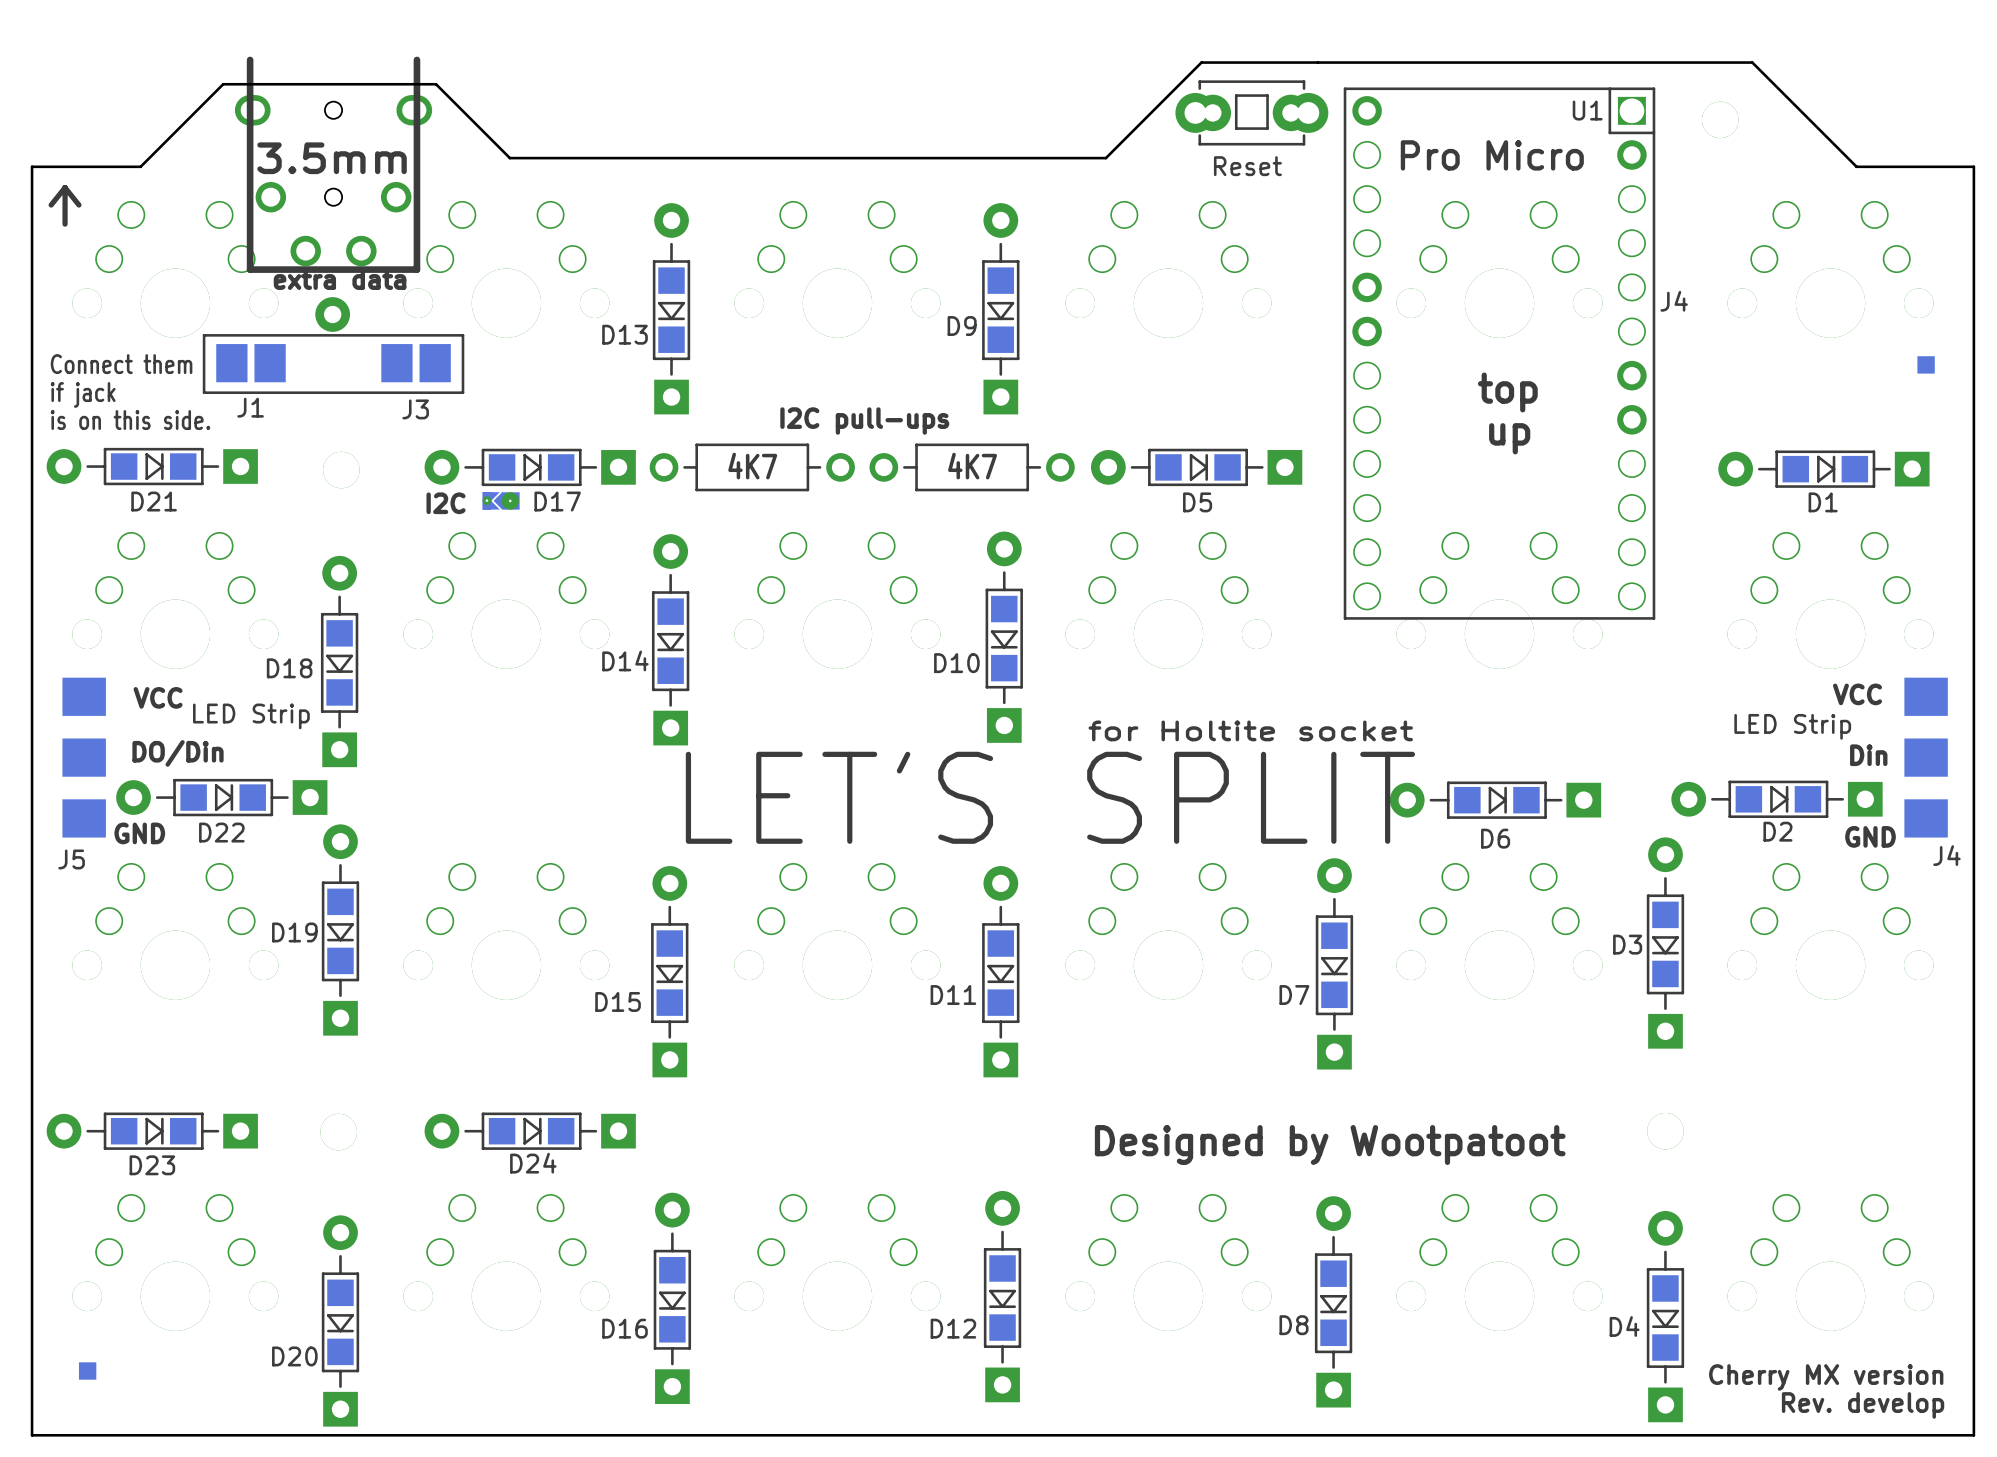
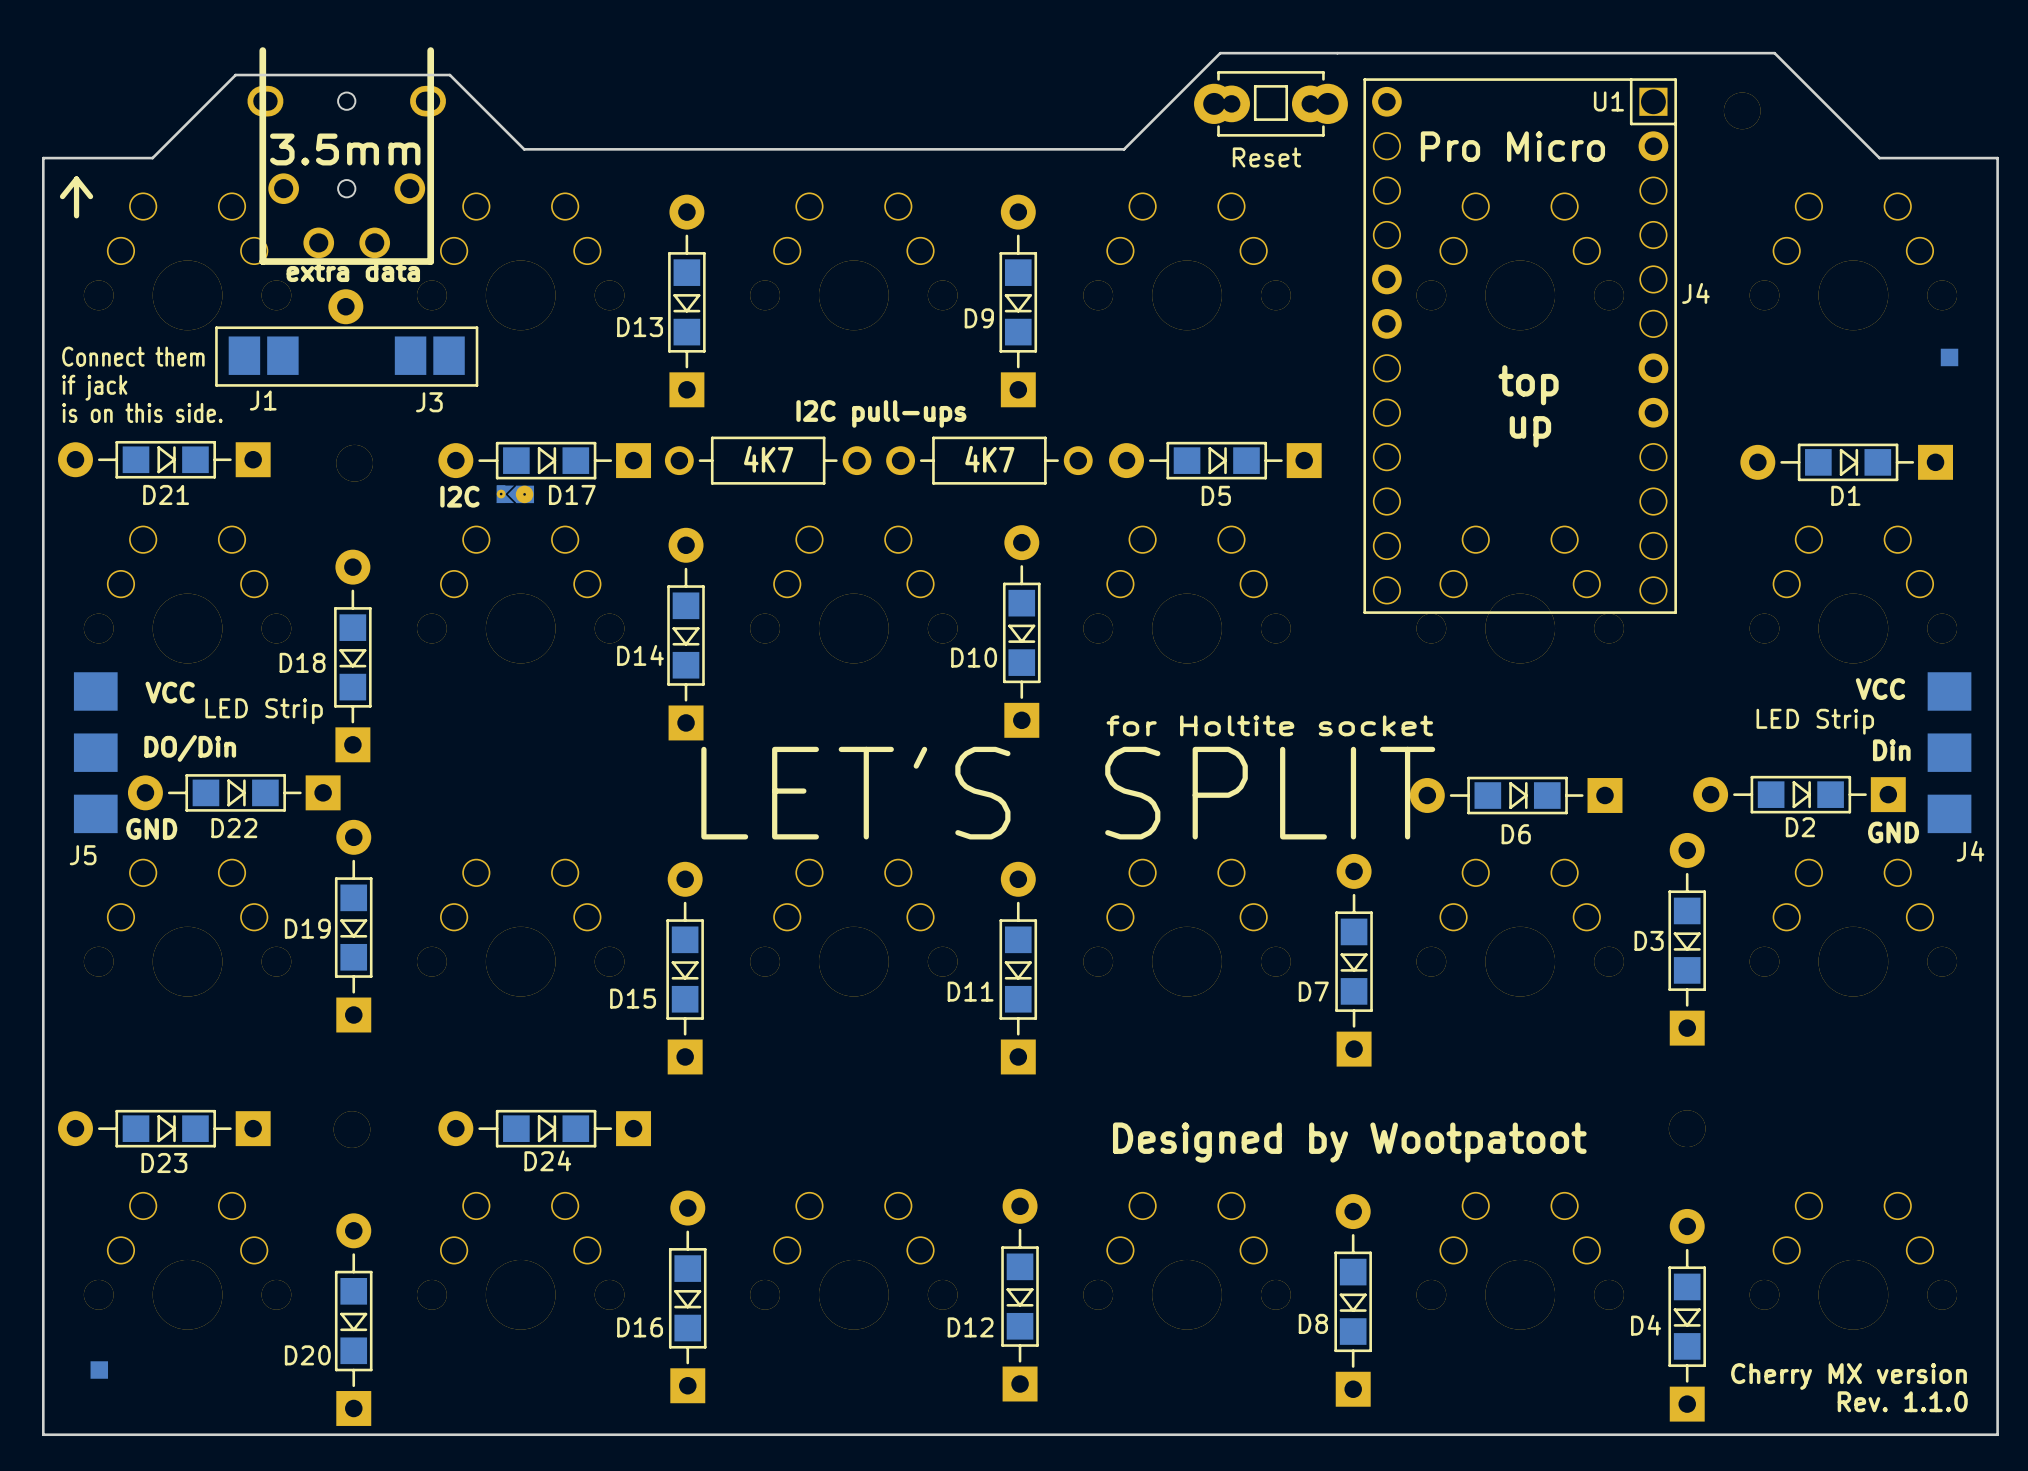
text: Rev. develop (1863, 1405) -> Rev. 1.1.0 (1902, 1401)

